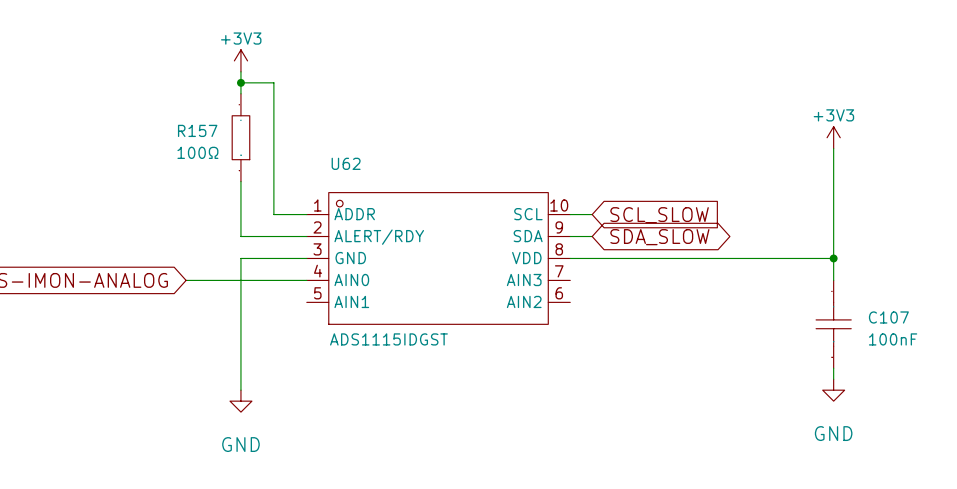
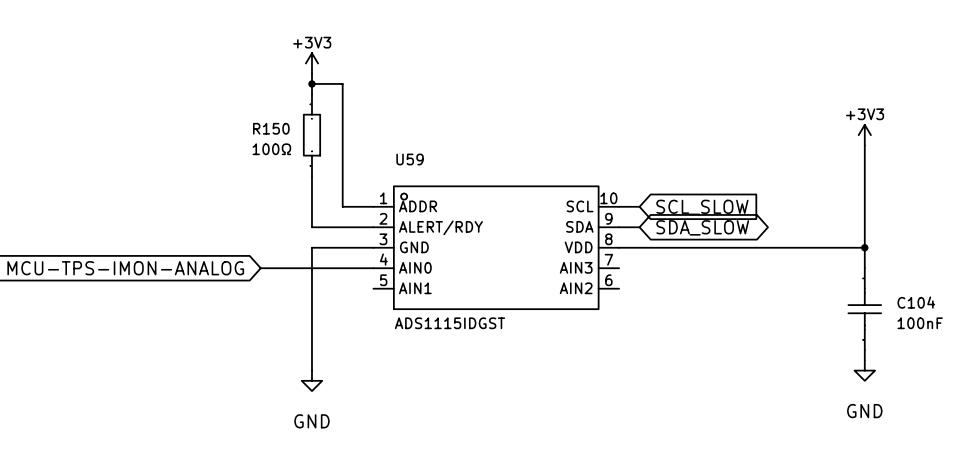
R157 name: R157 (197, 130) -> R150 (271, 128)
U62 name: U62 (346, 163) -> U59 (410, 159)
C107 name: C107 (888, 317) -> C104 (916, 302)

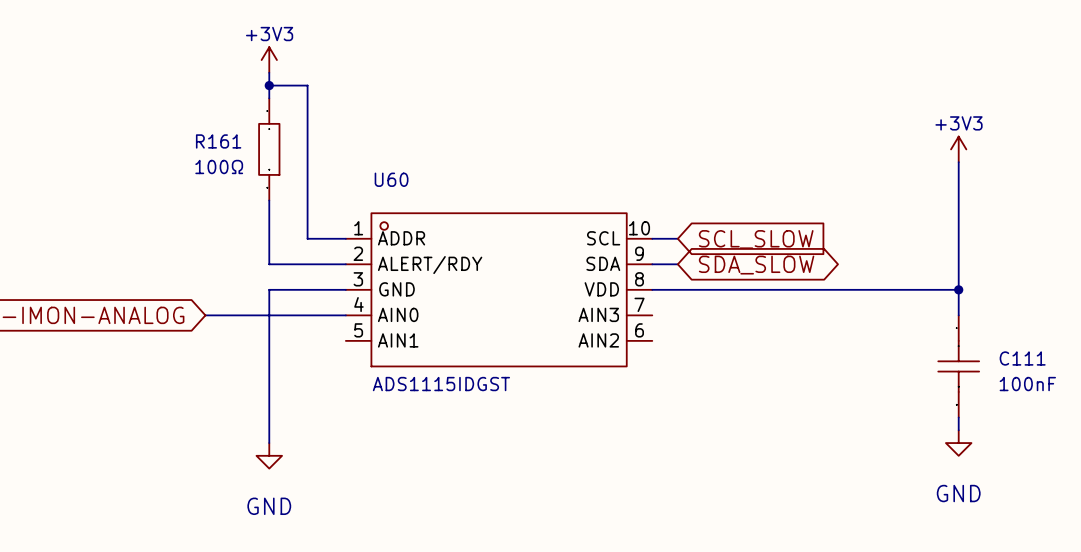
R150 name: R150 (271, 128) -> R161 (218, 141)
U59 name: U59 (410, 159) -> U60 (391, 179)
C104 name: C104 (916, 302) -> C111 (1022, 358)

